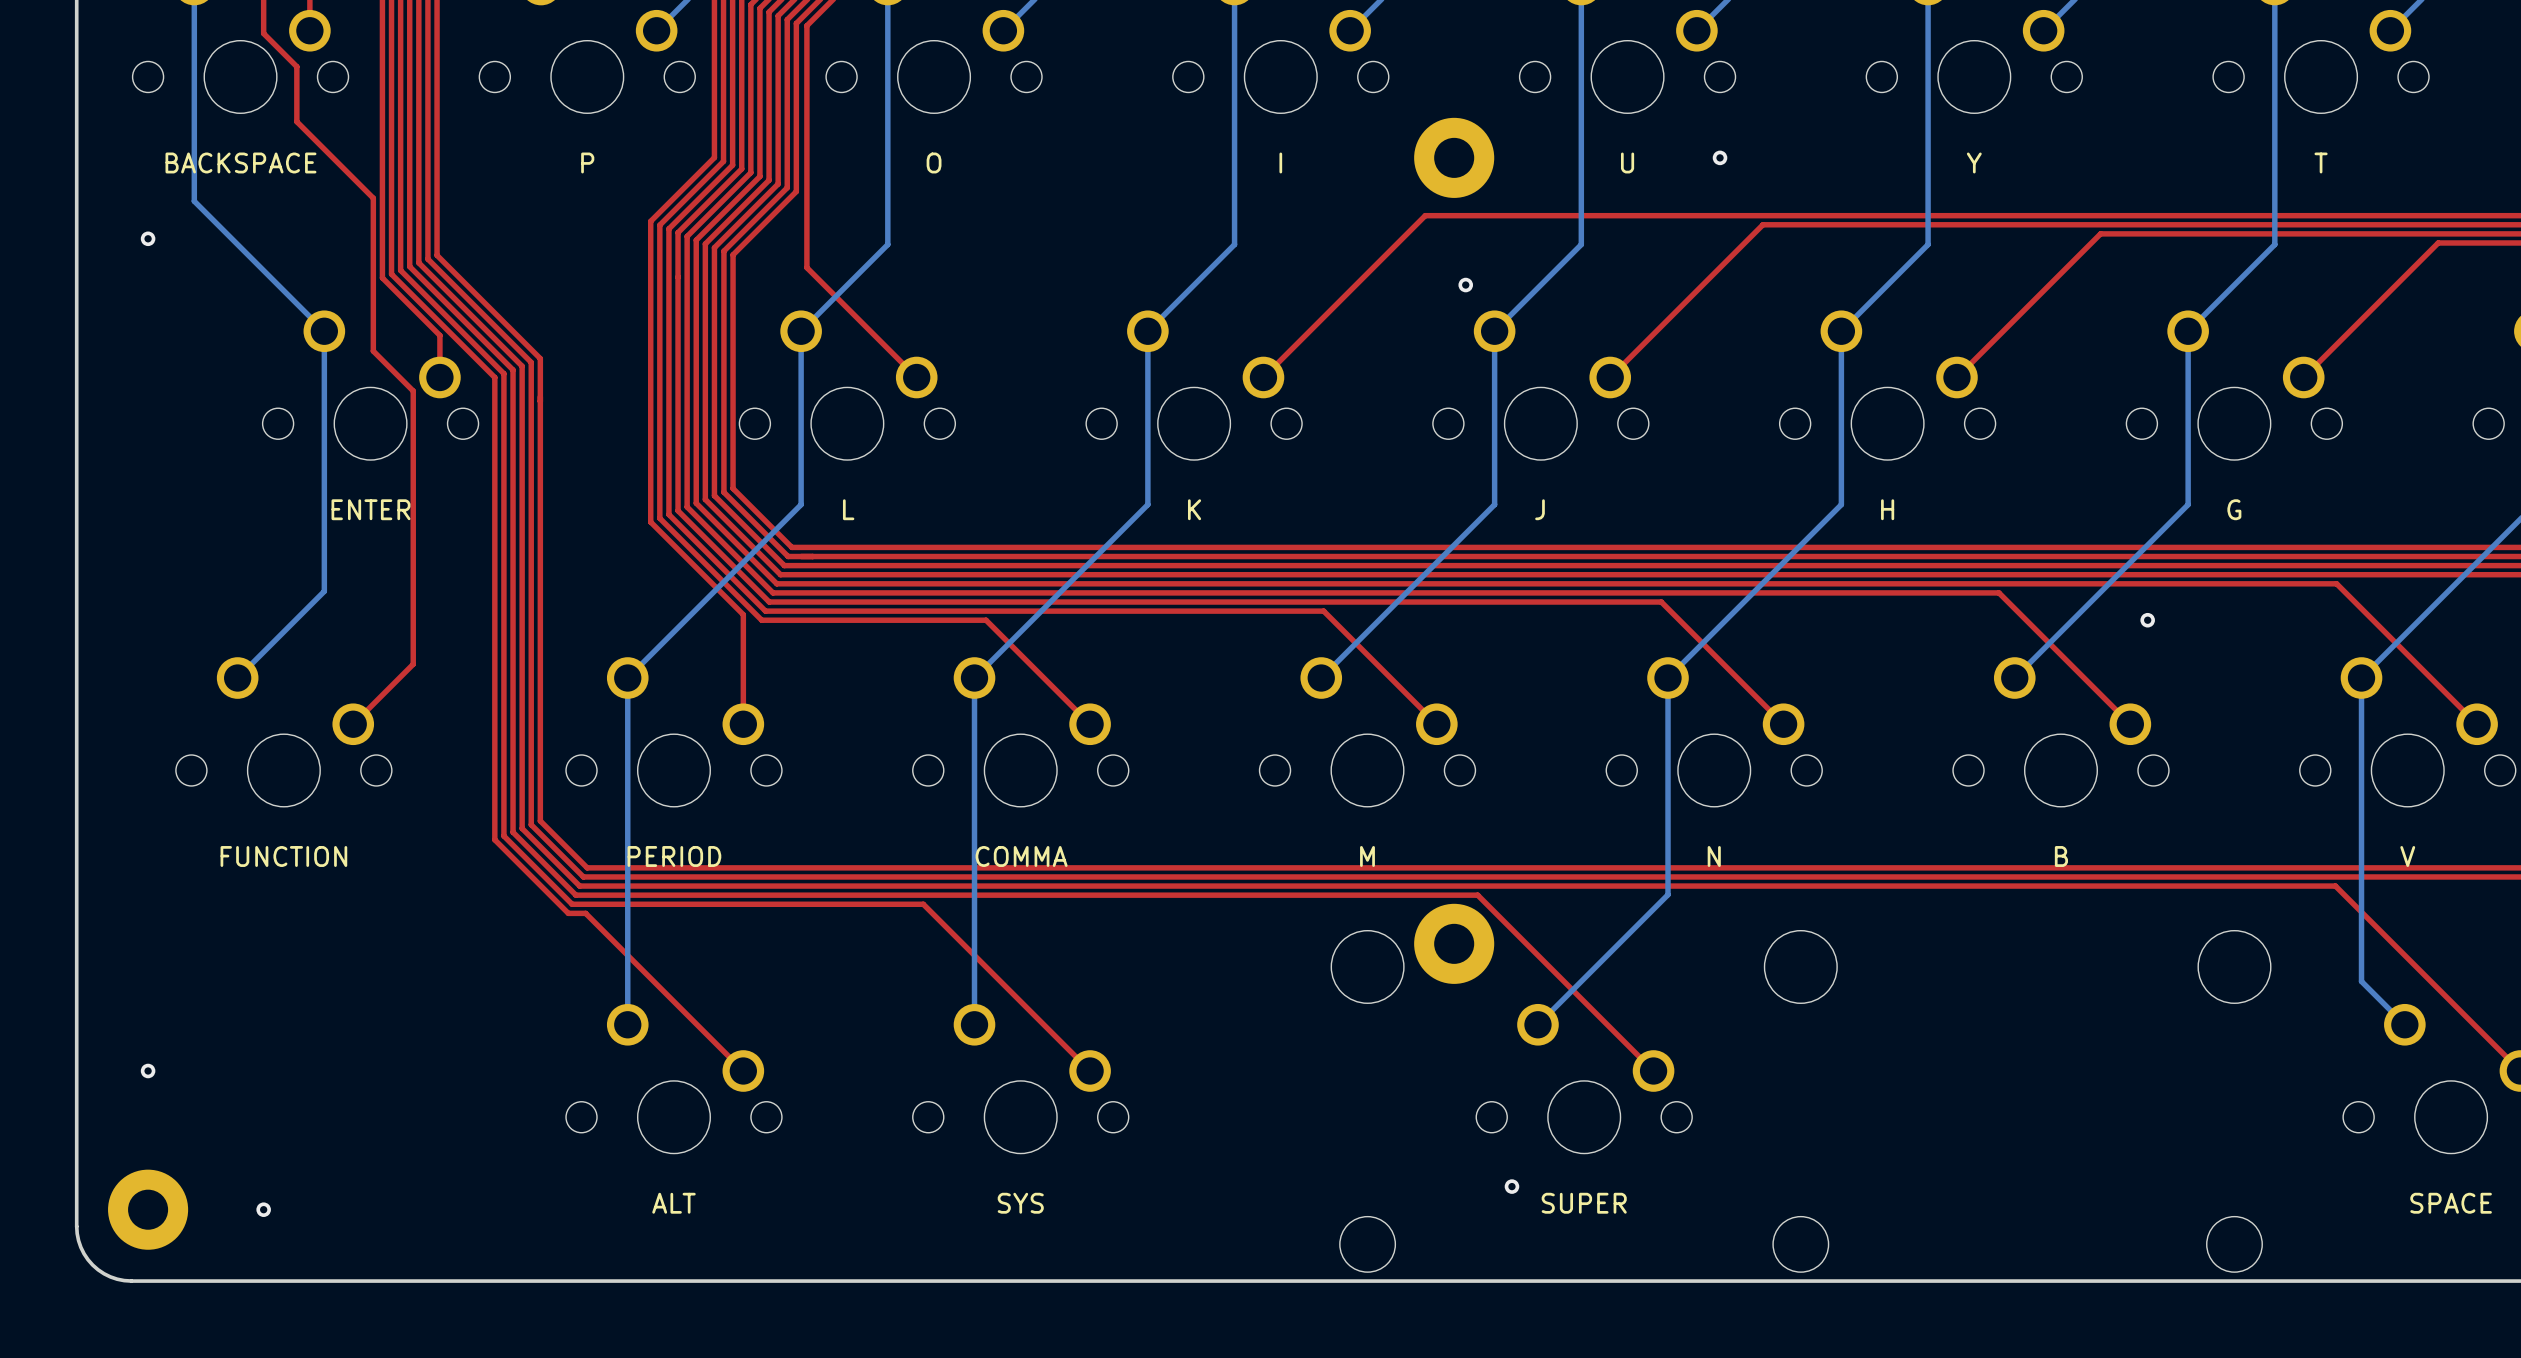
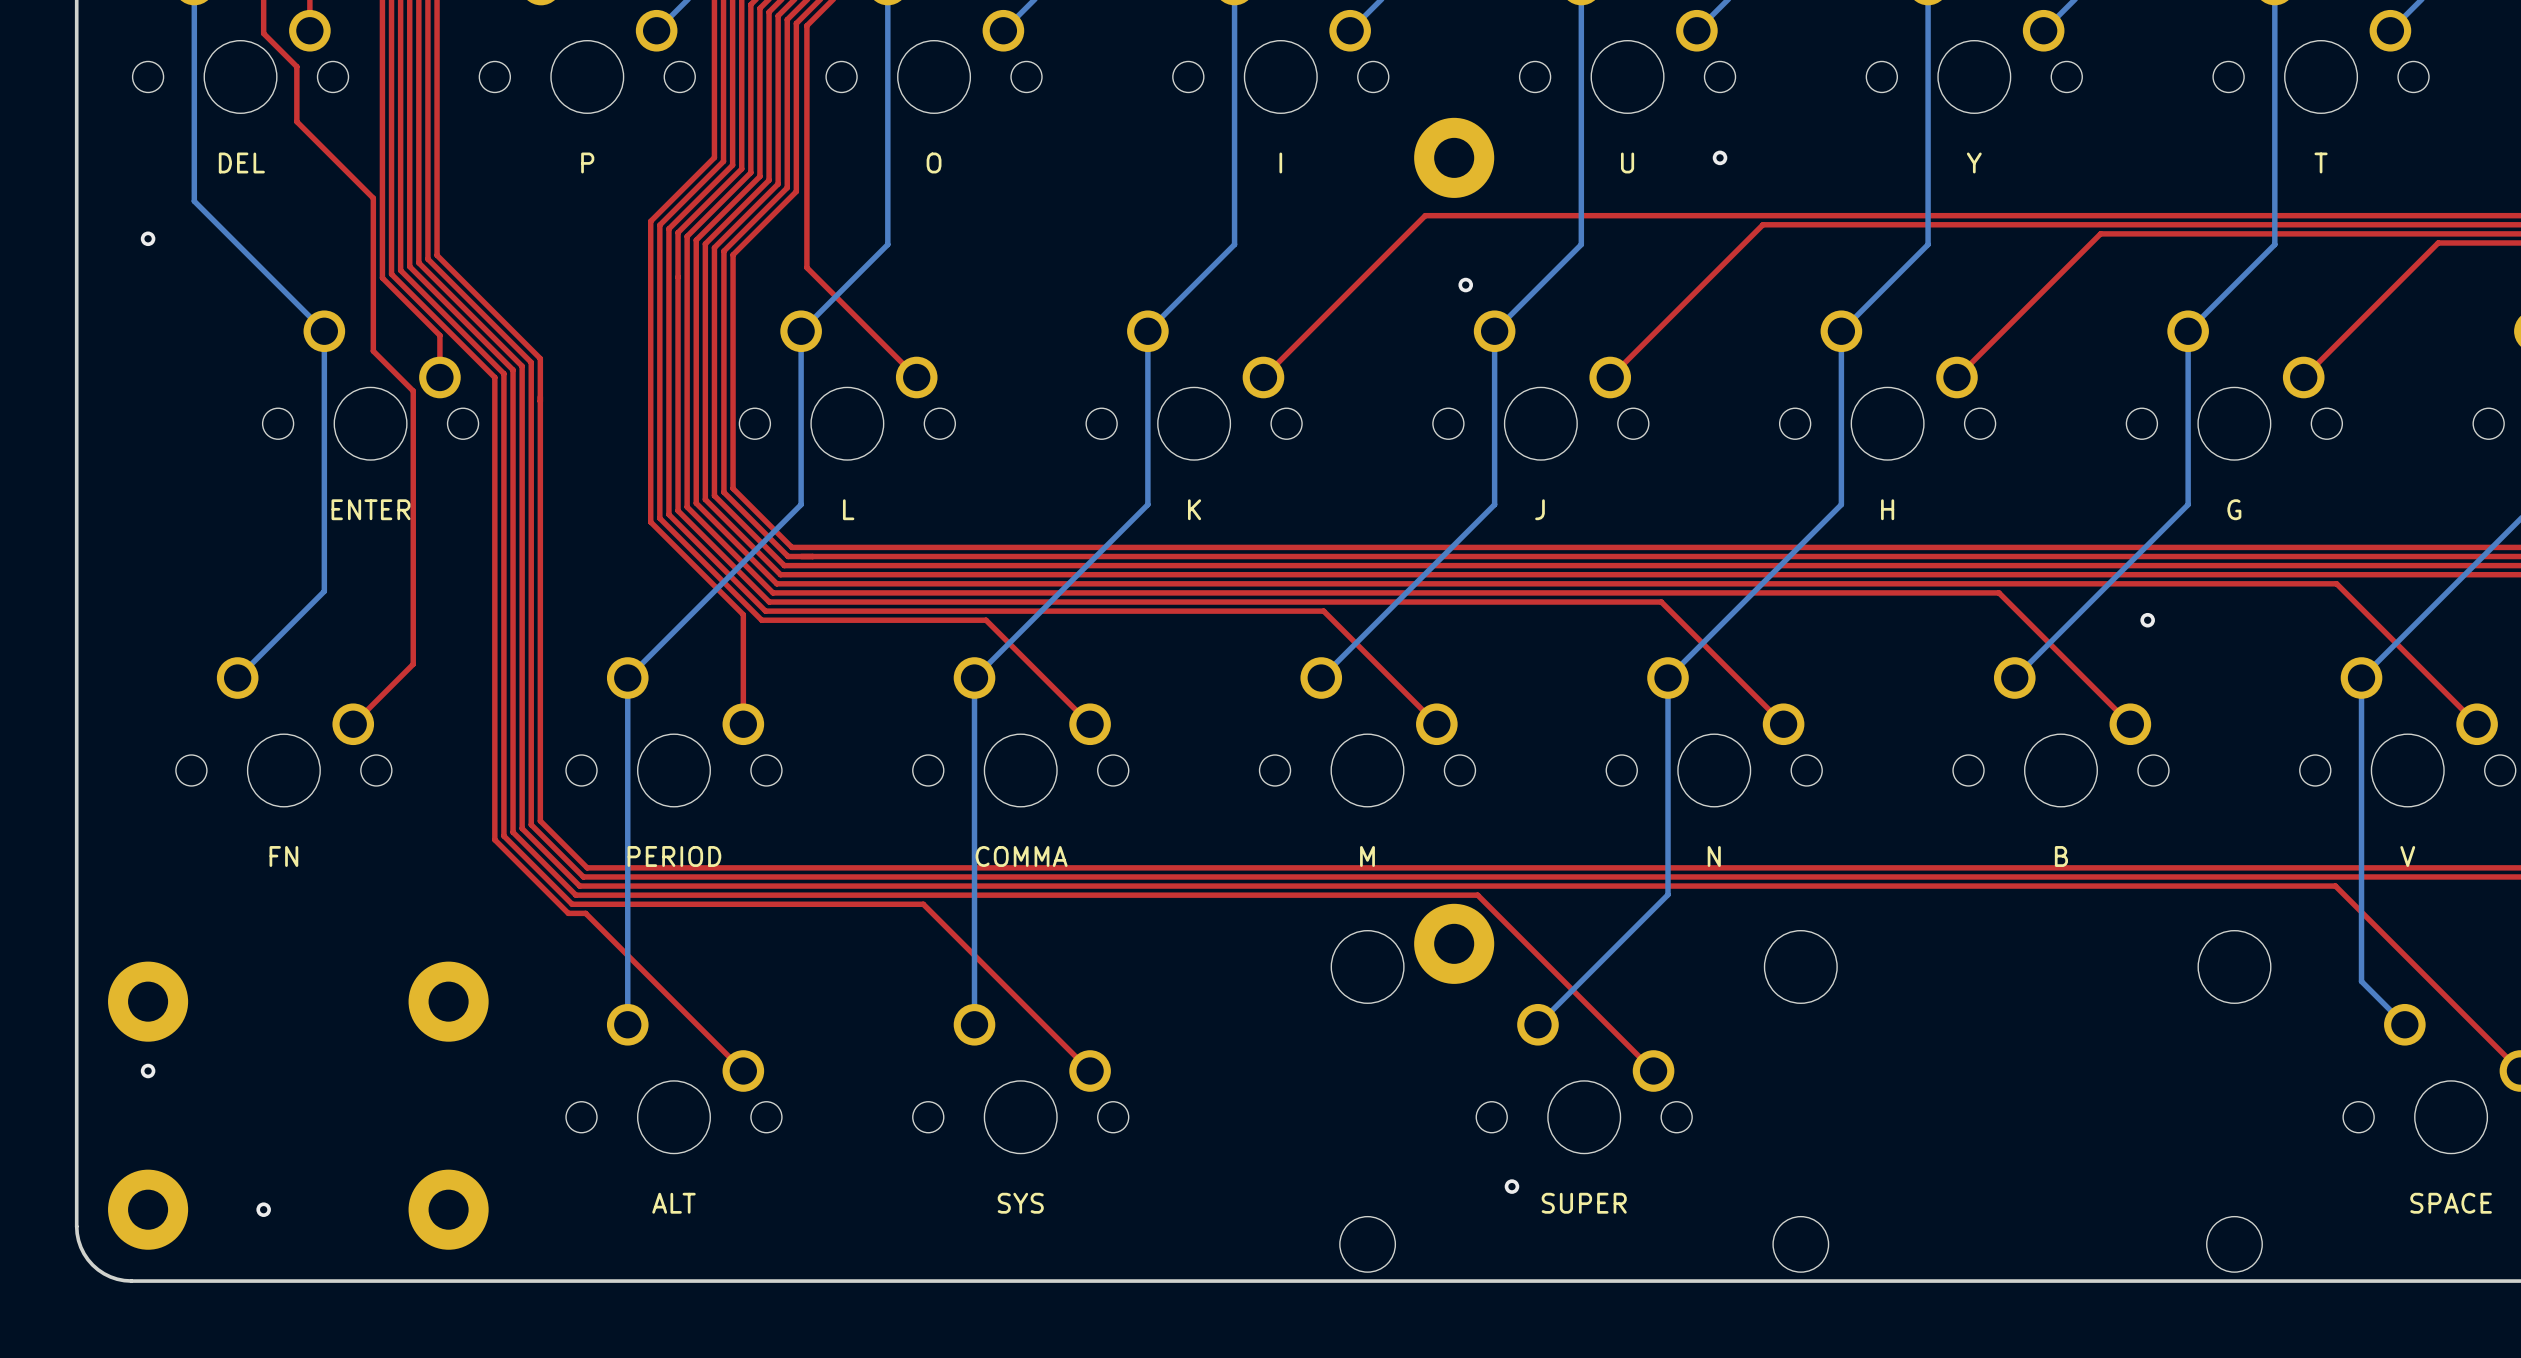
text: BACKSPACE (240, 162) -> DEL (241, 162)
text: FUNCTION (283, 856) -> FN (283, 856)
part: none -> (148, 1001)
part: none -> (448, 1001)
part: none -> (448, 1209)

